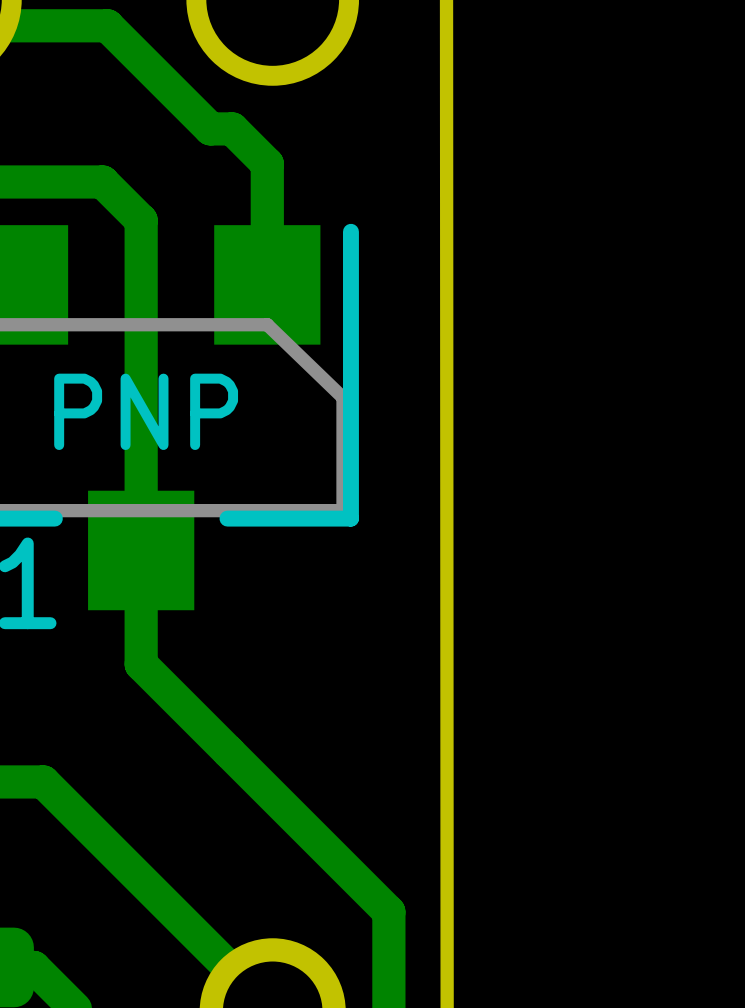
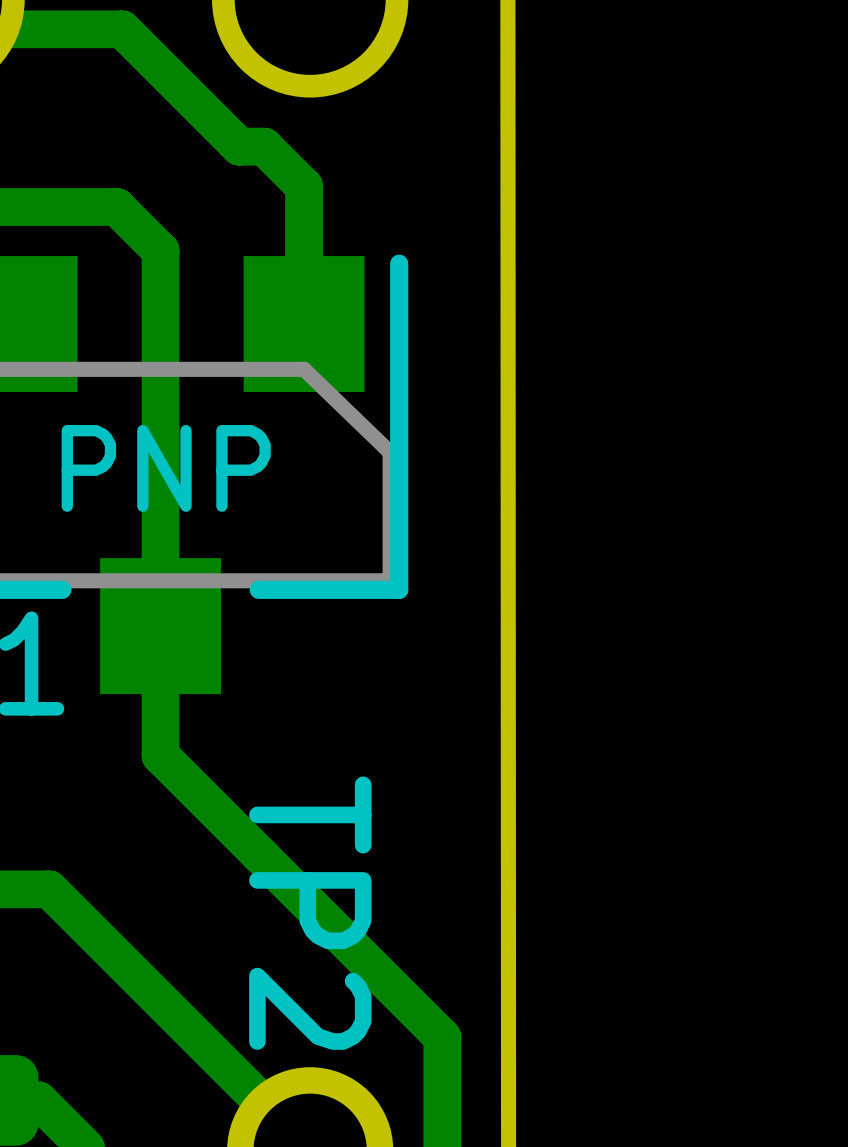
text: none -> TP2 (310, 913)

